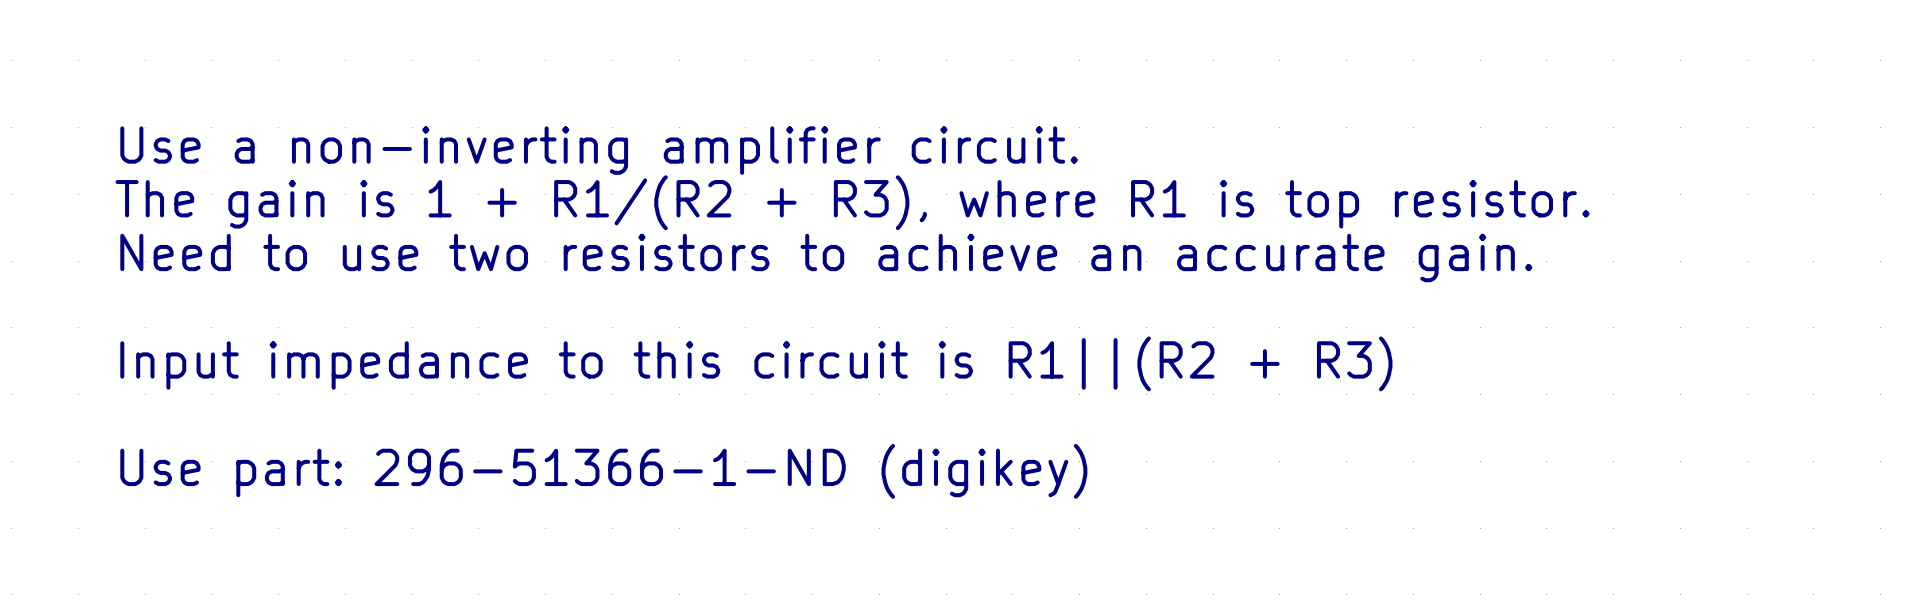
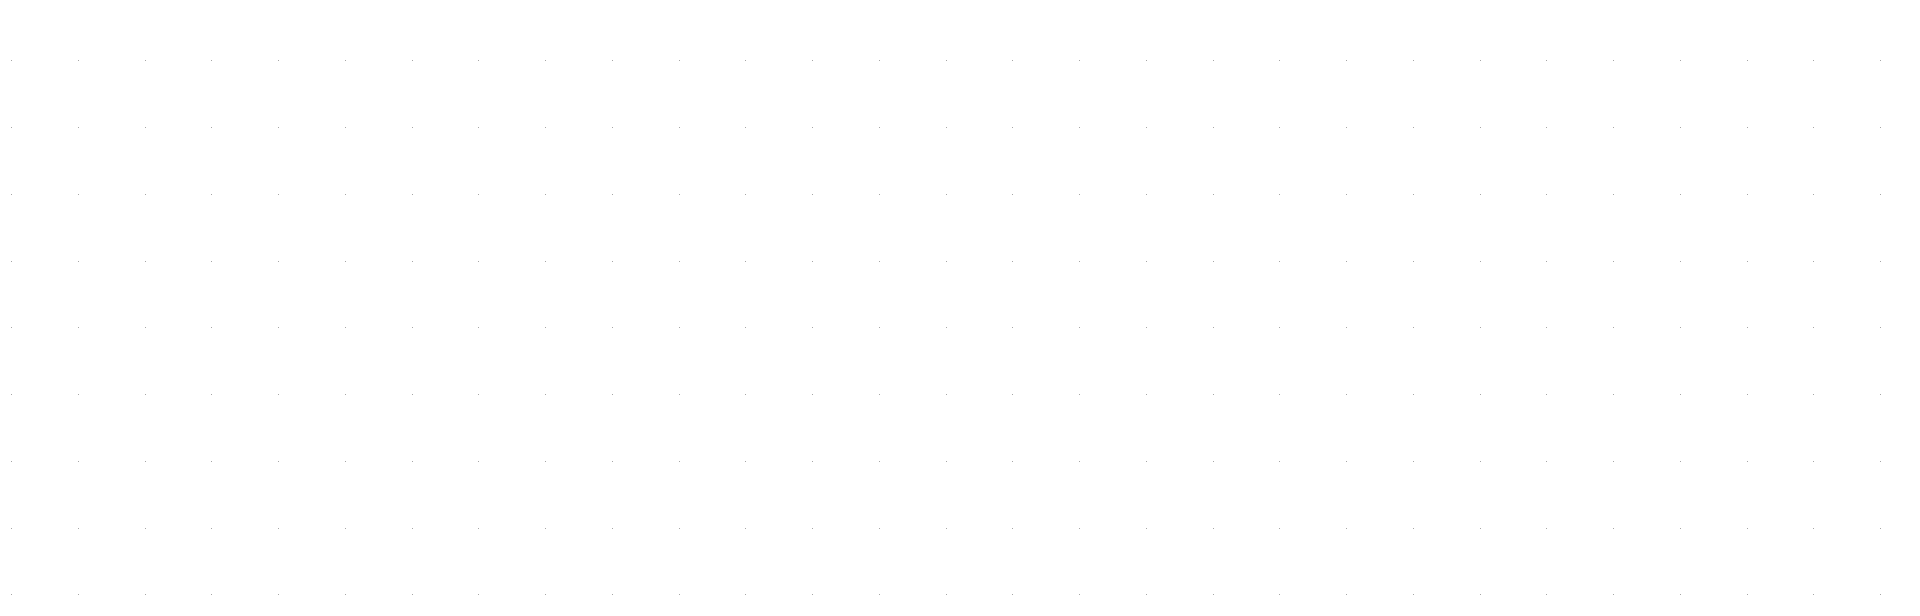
text: Use a non-inverting amplifier circuit. (599, 150) -> none
text: The gain is 1 + R1/(R2 + R3), where R1 is top resistor. (852, 202) -> none
text: Need to use two resistors to achieve an accurate gain. (826, 258) -> none
text: Input impedance to this circuit is R1||(R2 + R3) (756, 363) -> none
text: Use part: 296-51366-1-ND (digikey) (603, 471) -> none

